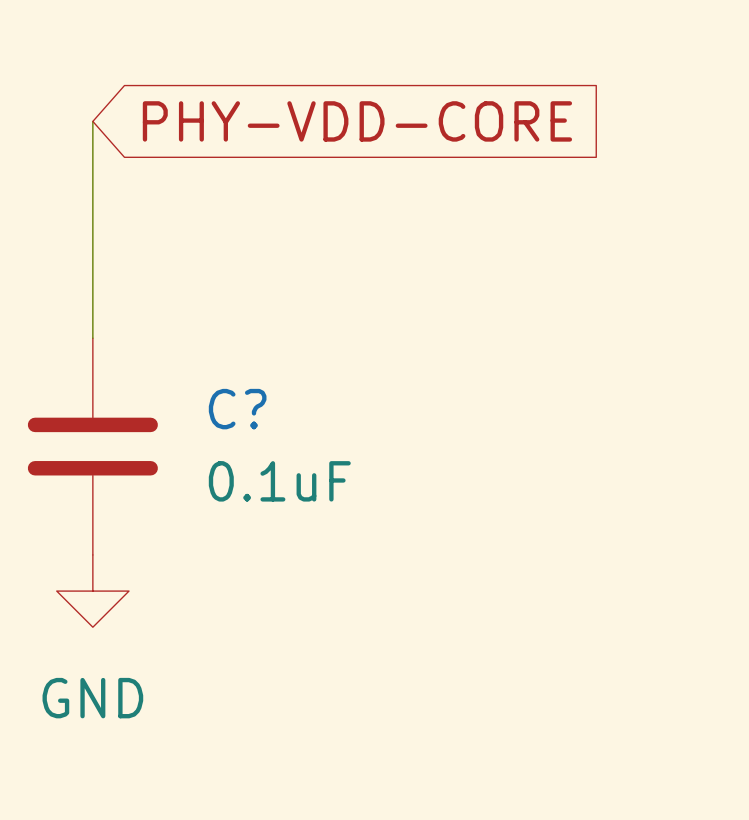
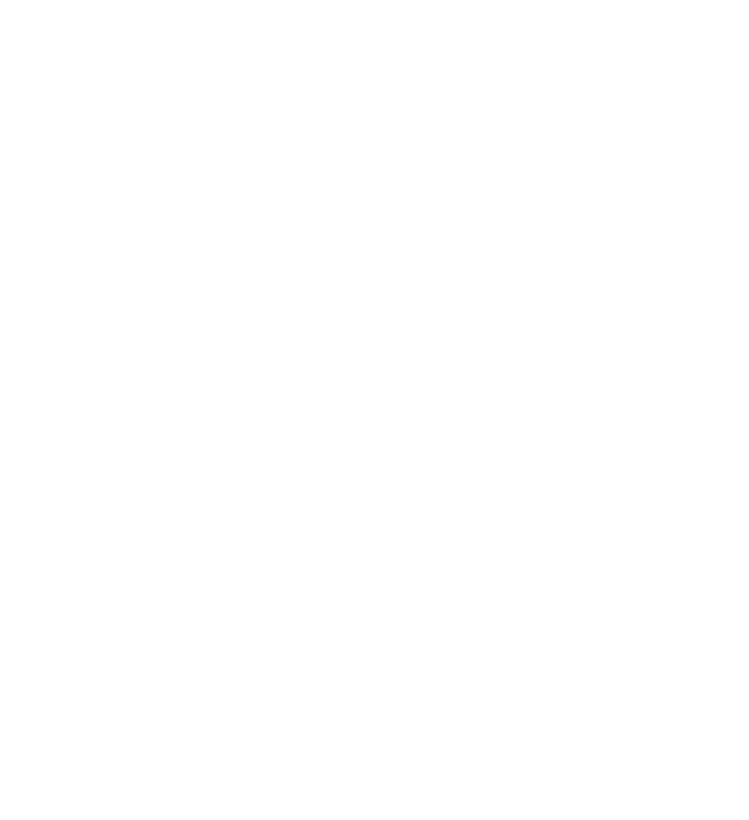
wire: (92, 121) (92, 338) -> none
global label: PHY-VDD-CORE (357, 121) -> none
C?: 0.1uF (92, 446) -> none
power symbol: GND (92, 591) -> none

